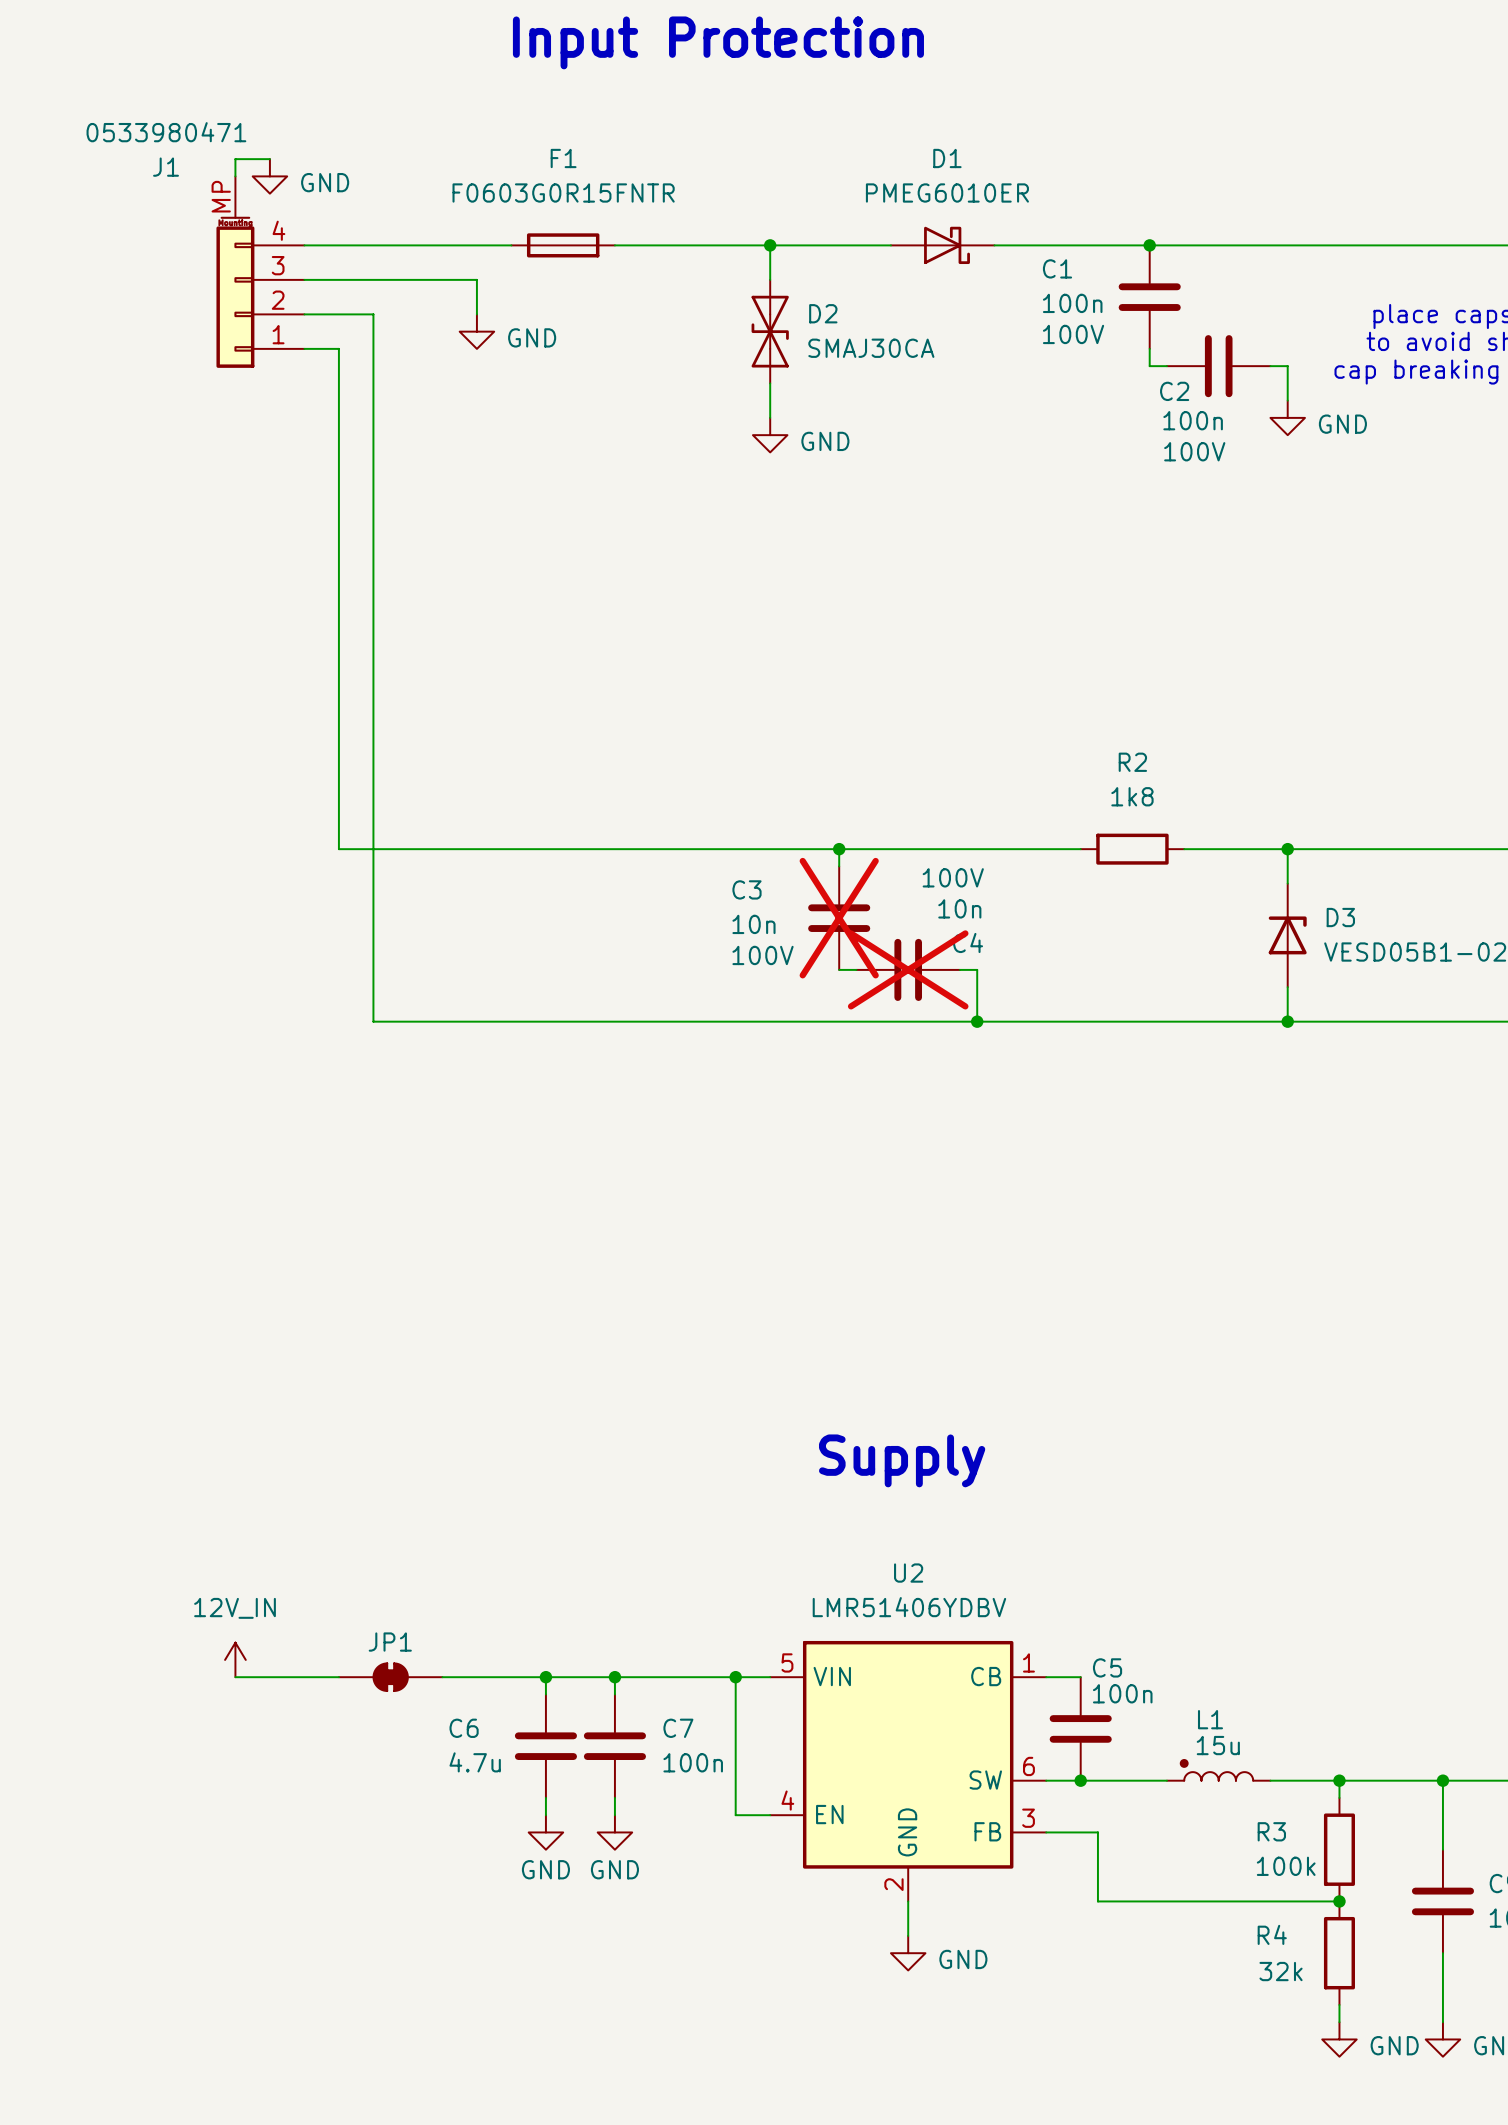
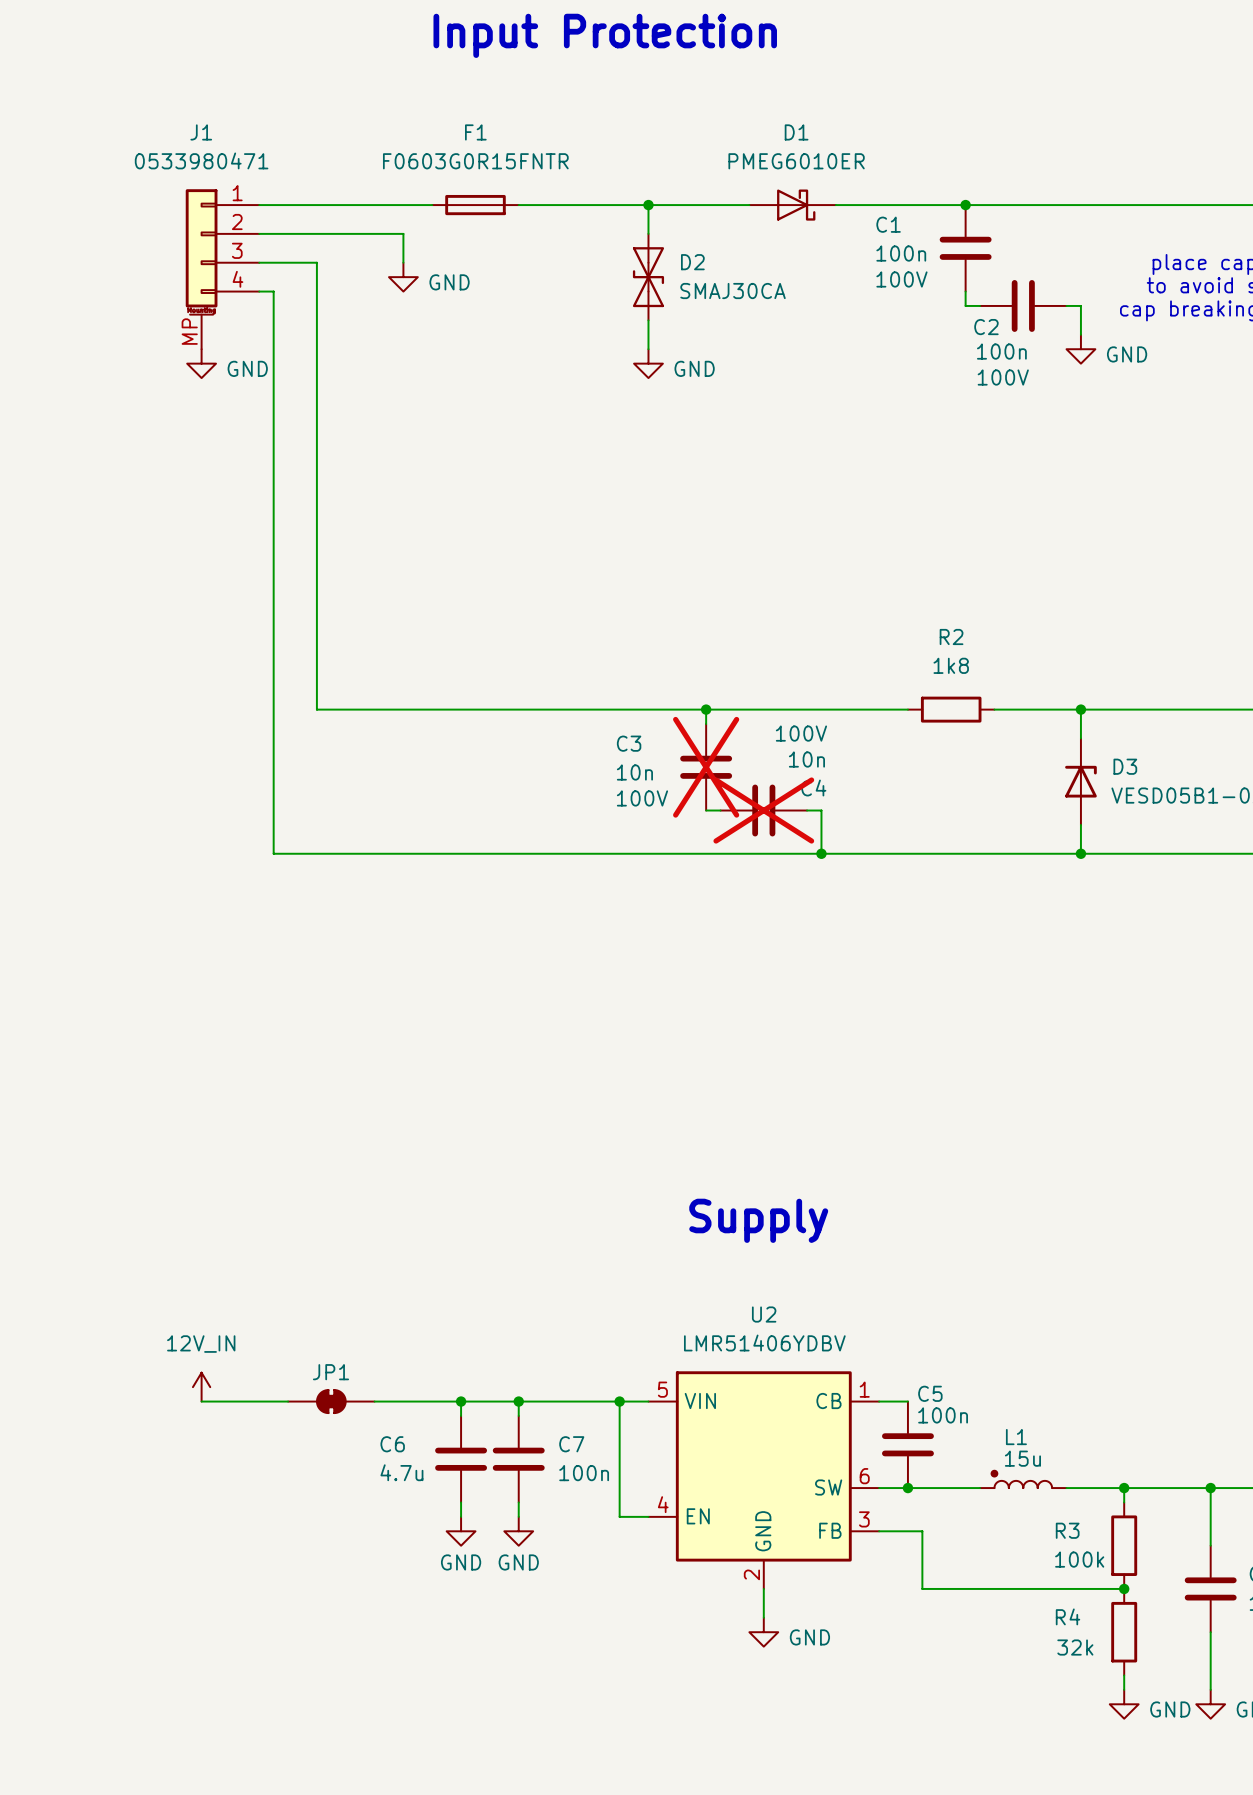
J1 value position: 0533980471 (166, 132) -> 0533980471 (201, 160)
wire: (269, 159) (235, 159) (235, 176) -> none
J1 name position: J1 (166, 167) -> J1 (201, 132)
power symbol position: GND (269, 176) -> GND (201, 363)
J1 flip: as is (235, 292) -> up-down (201, 252)
wire: (321, 348) (338, 348) (338, 849) (373, 849) (373, 1021) -> (273, 291) (273, 853) (316, 853)

